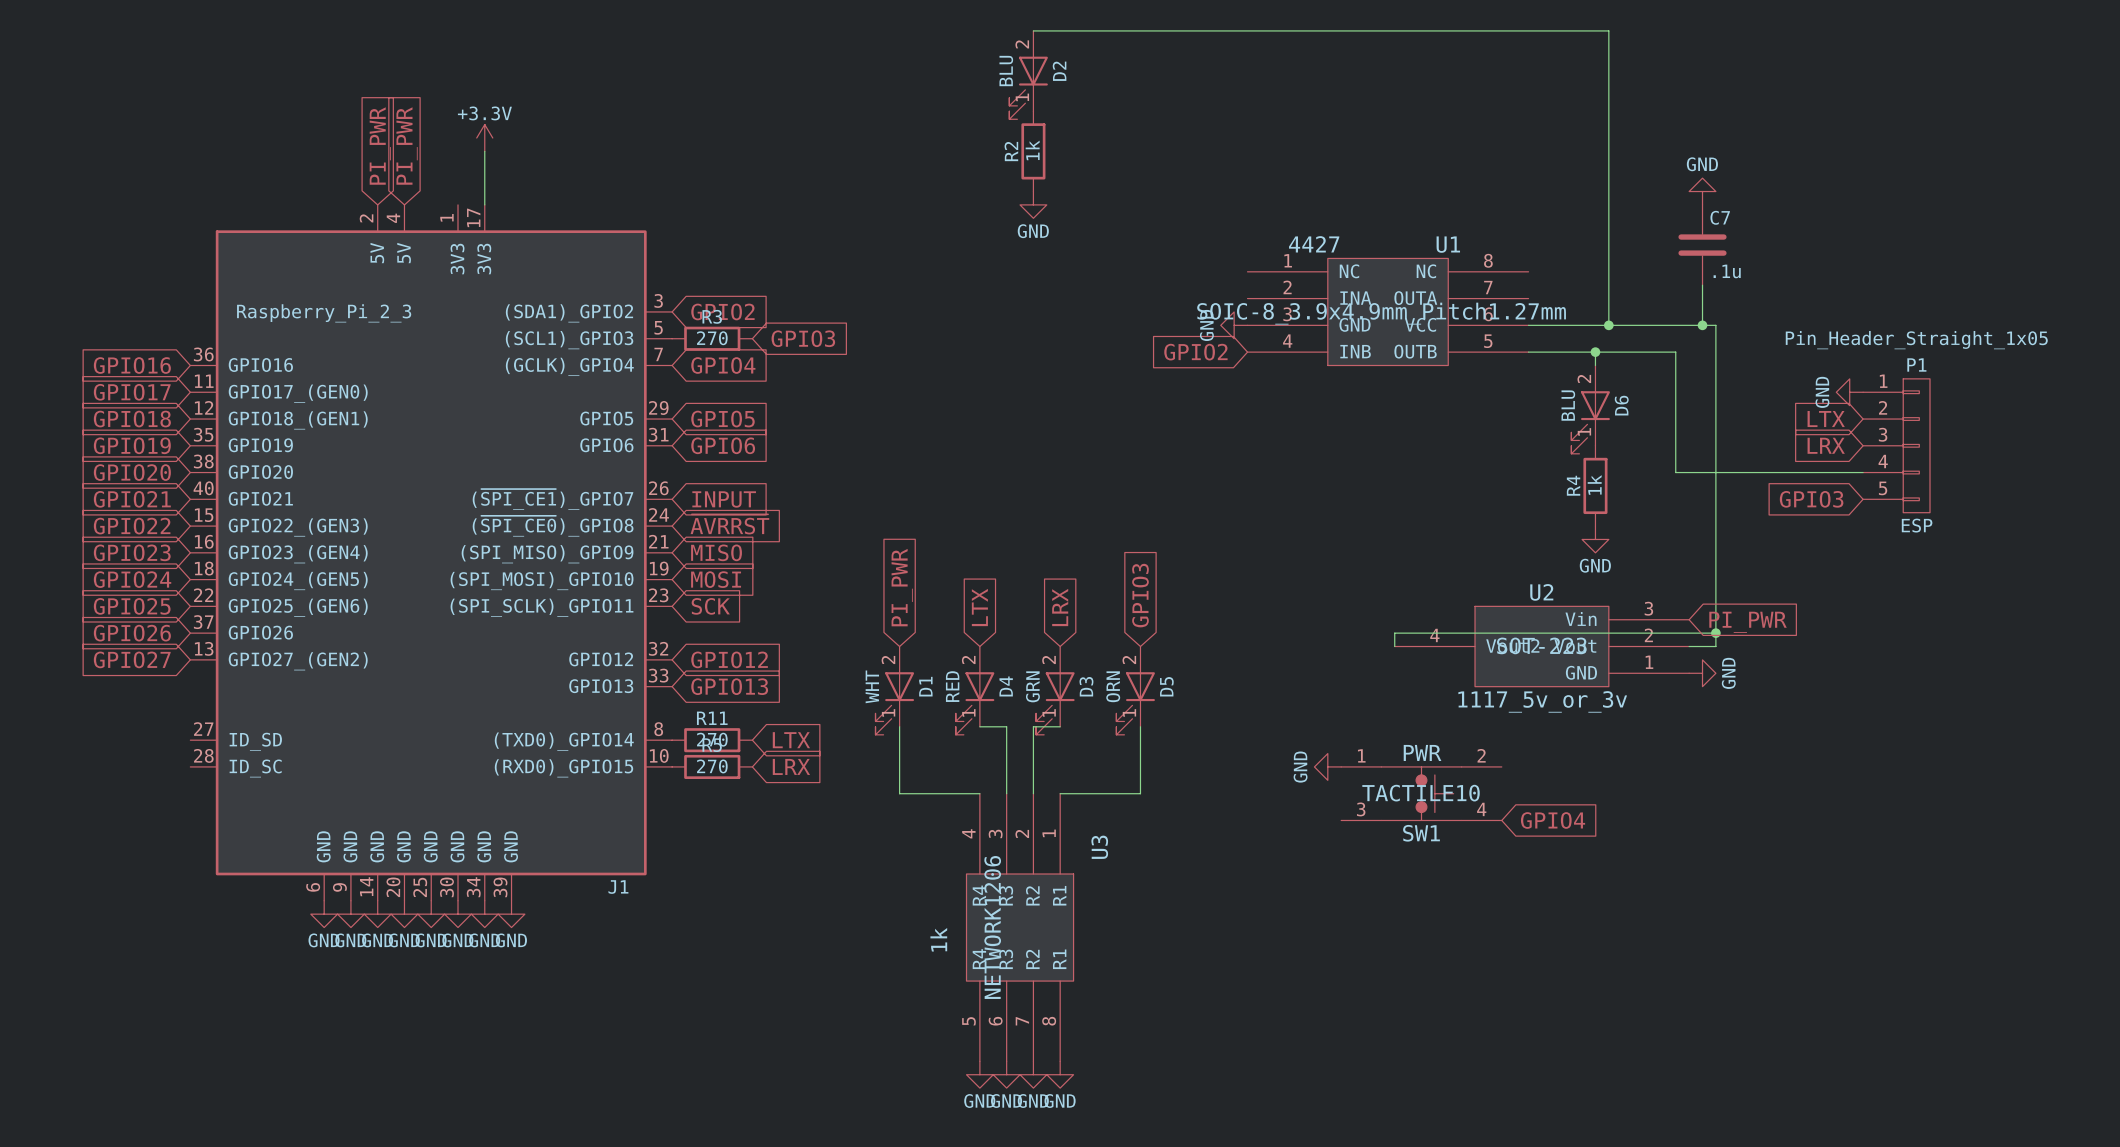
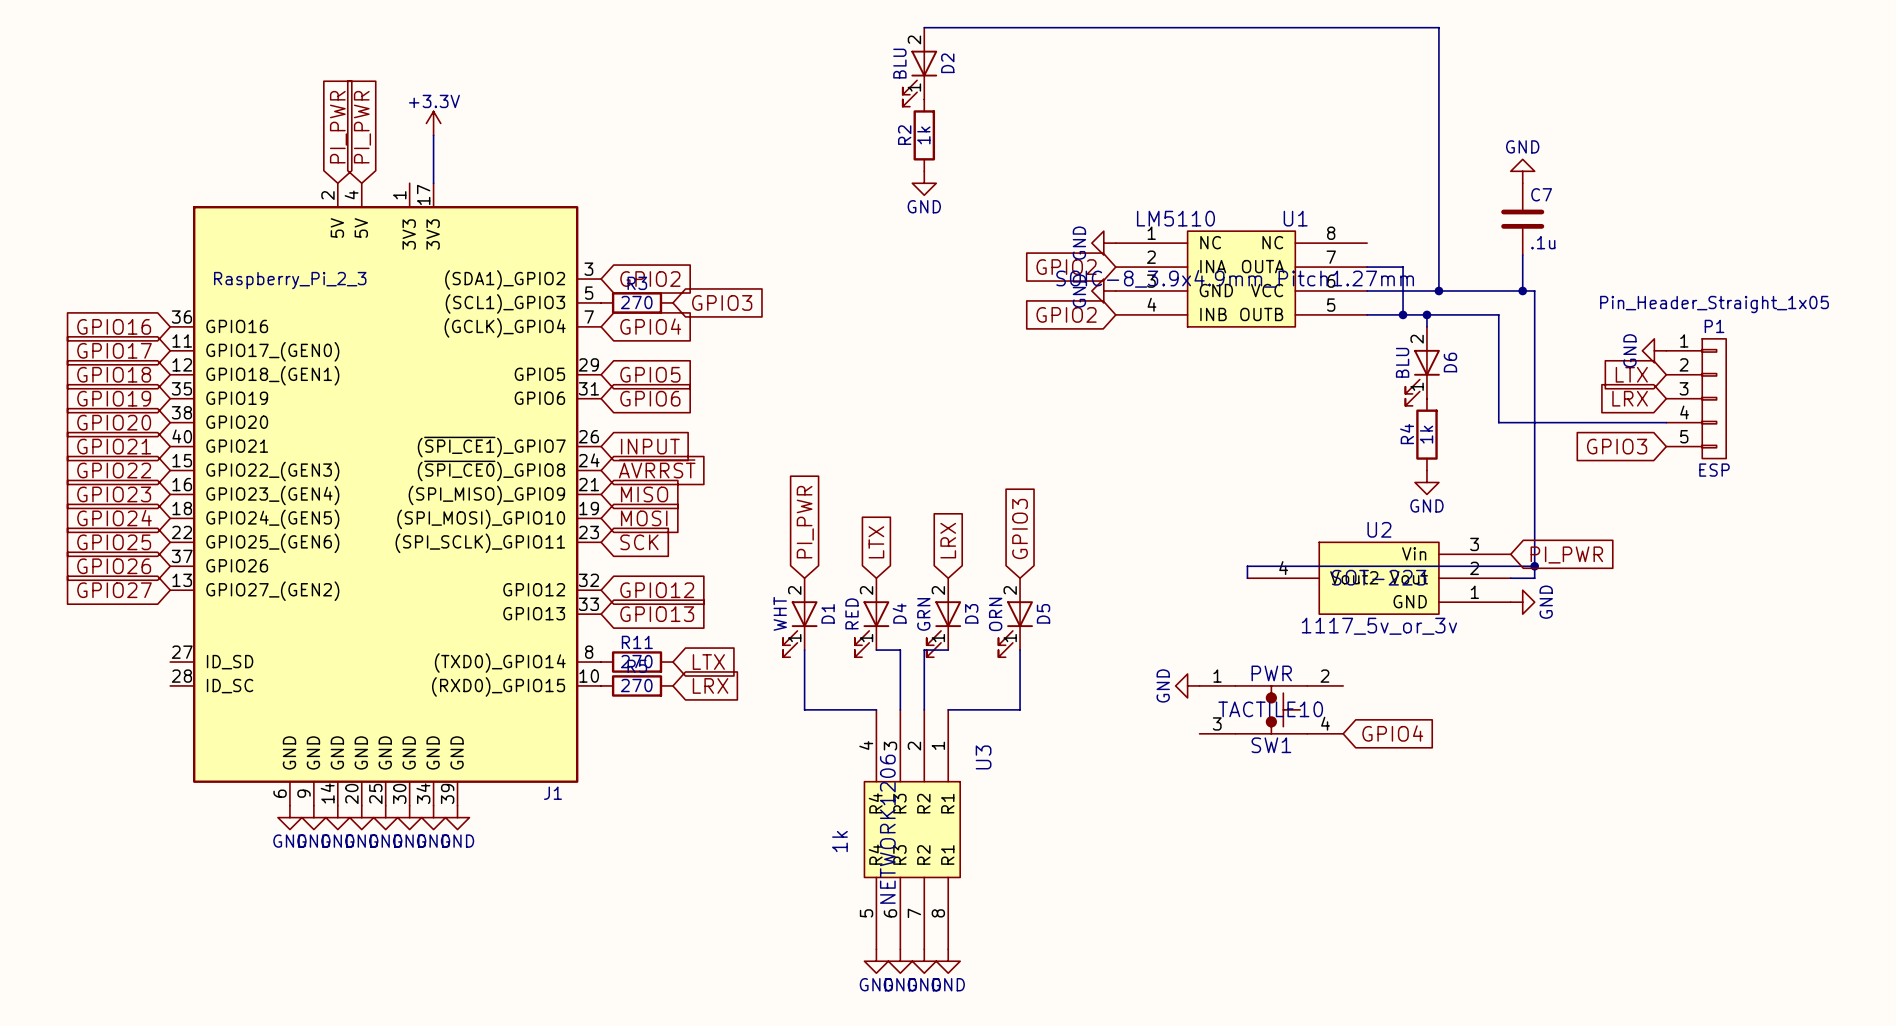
U1 value: 4427 (1314, 244) -> LM5110 (1175, 218)
power symbol: none -> GND (1103, 243)
global label: none -> GPIO2 (1066, 267)
wire: none -> (1367, 267) (1403, 267) (1403, 314)
junction: none -> (1403, 314)

